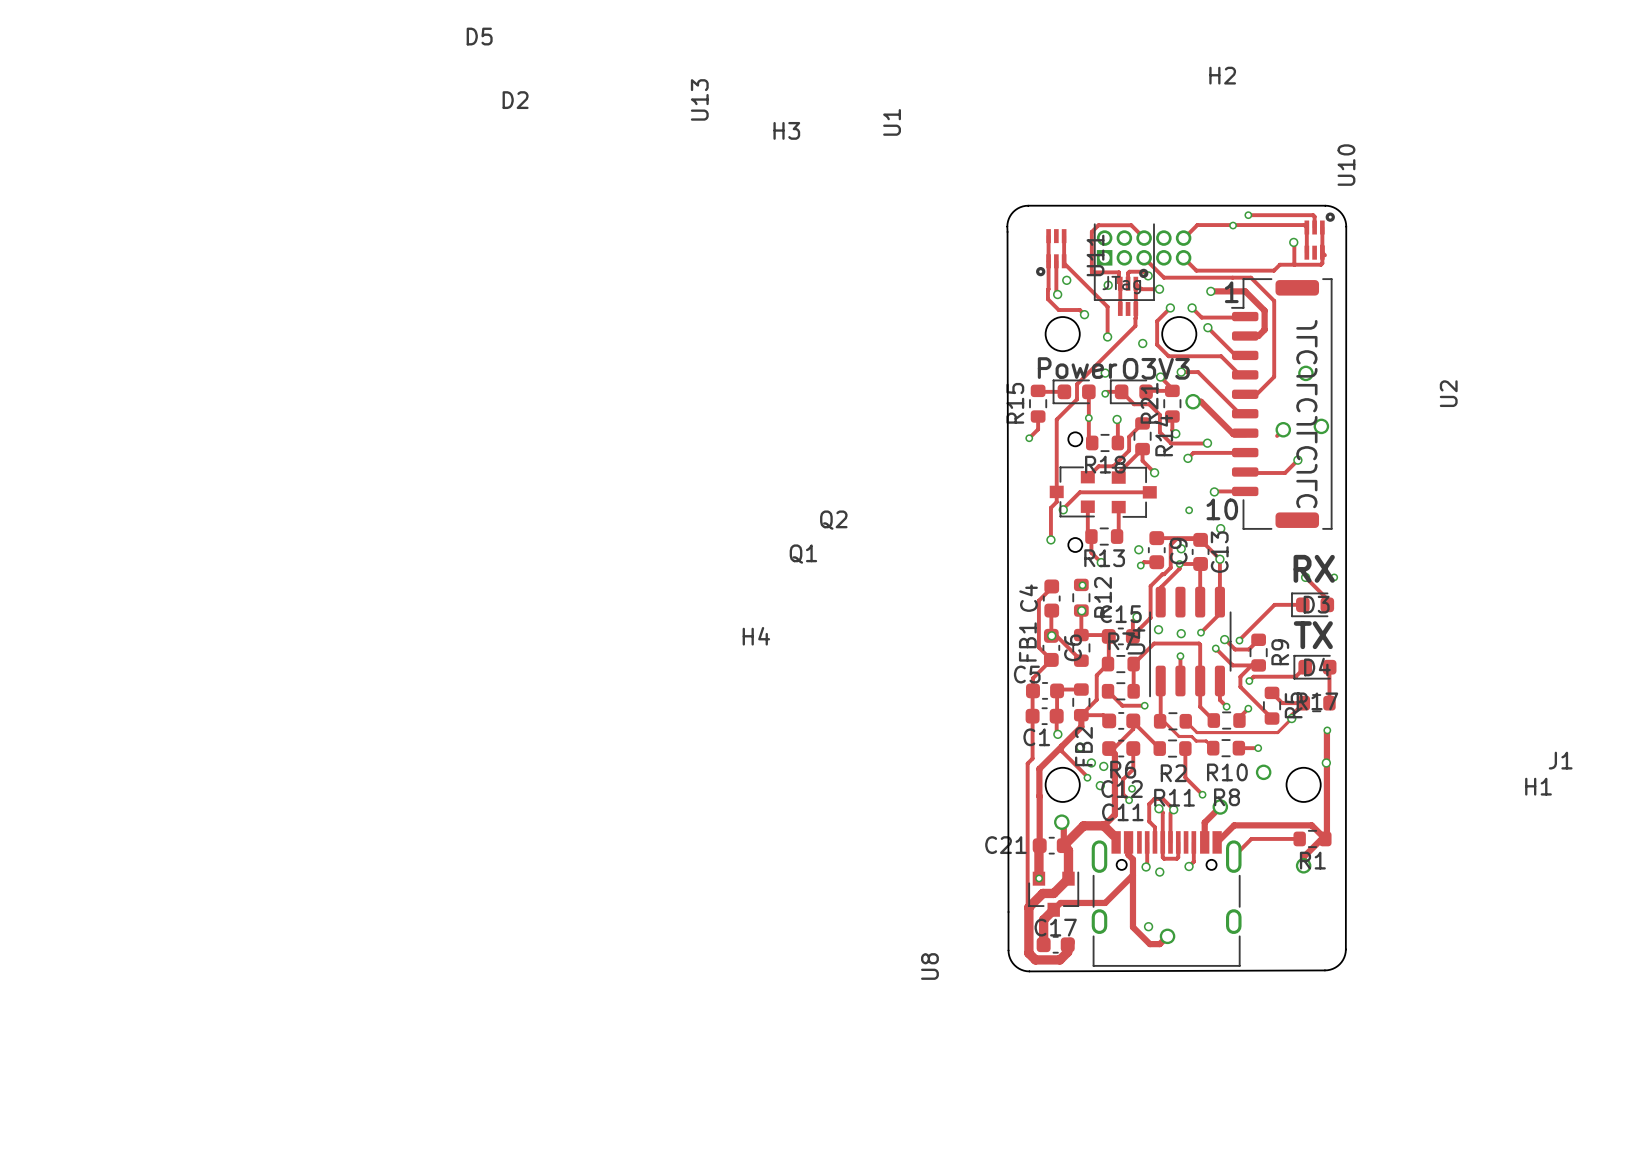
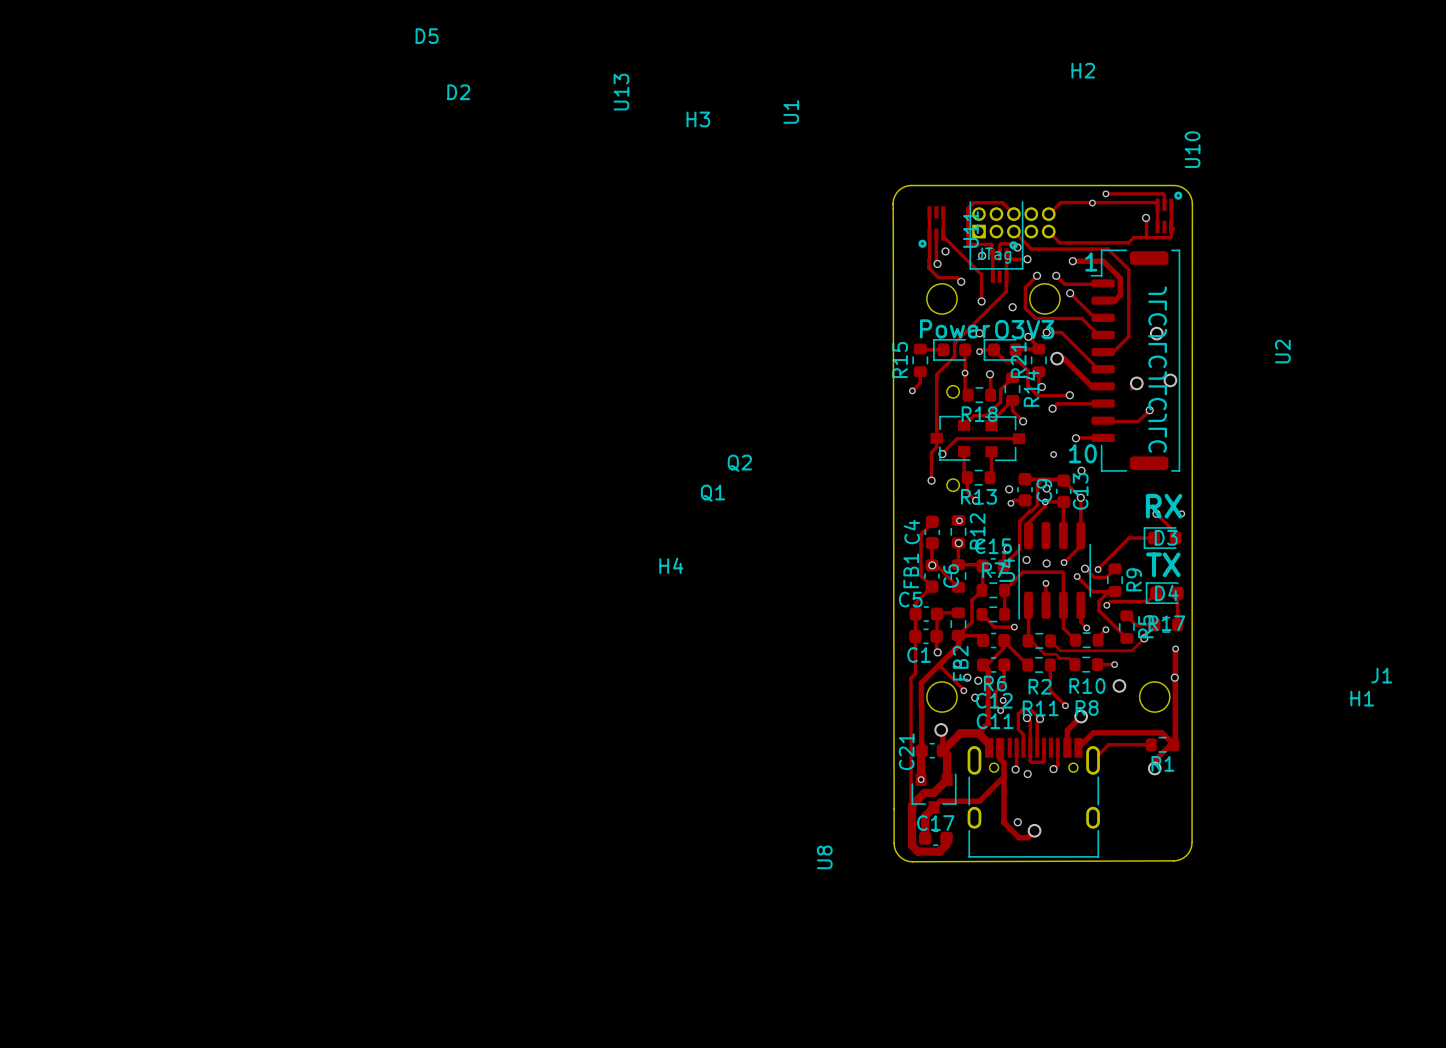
C21 name rotation: 0° (1005, 845) -> 90° counterclockwise (906, 751)

